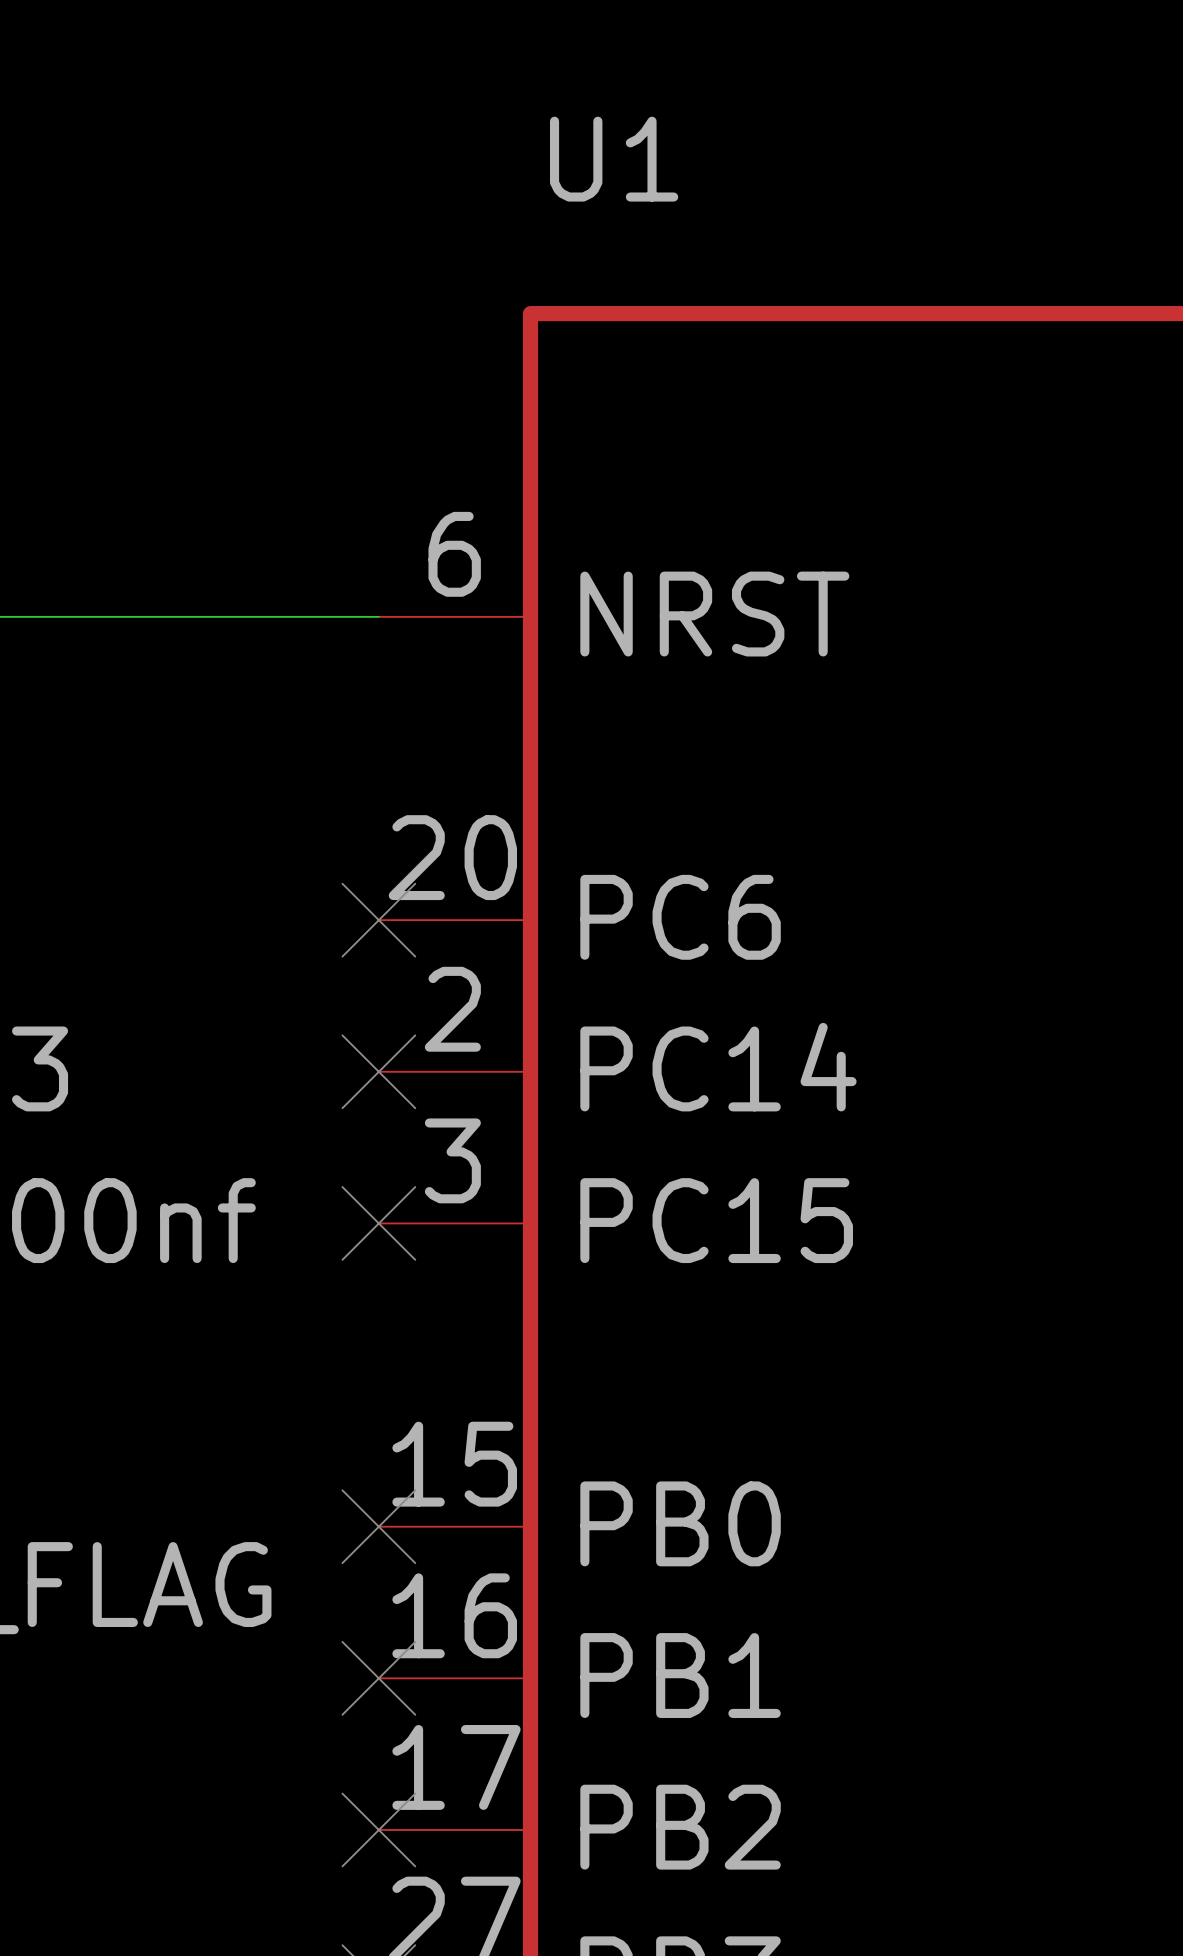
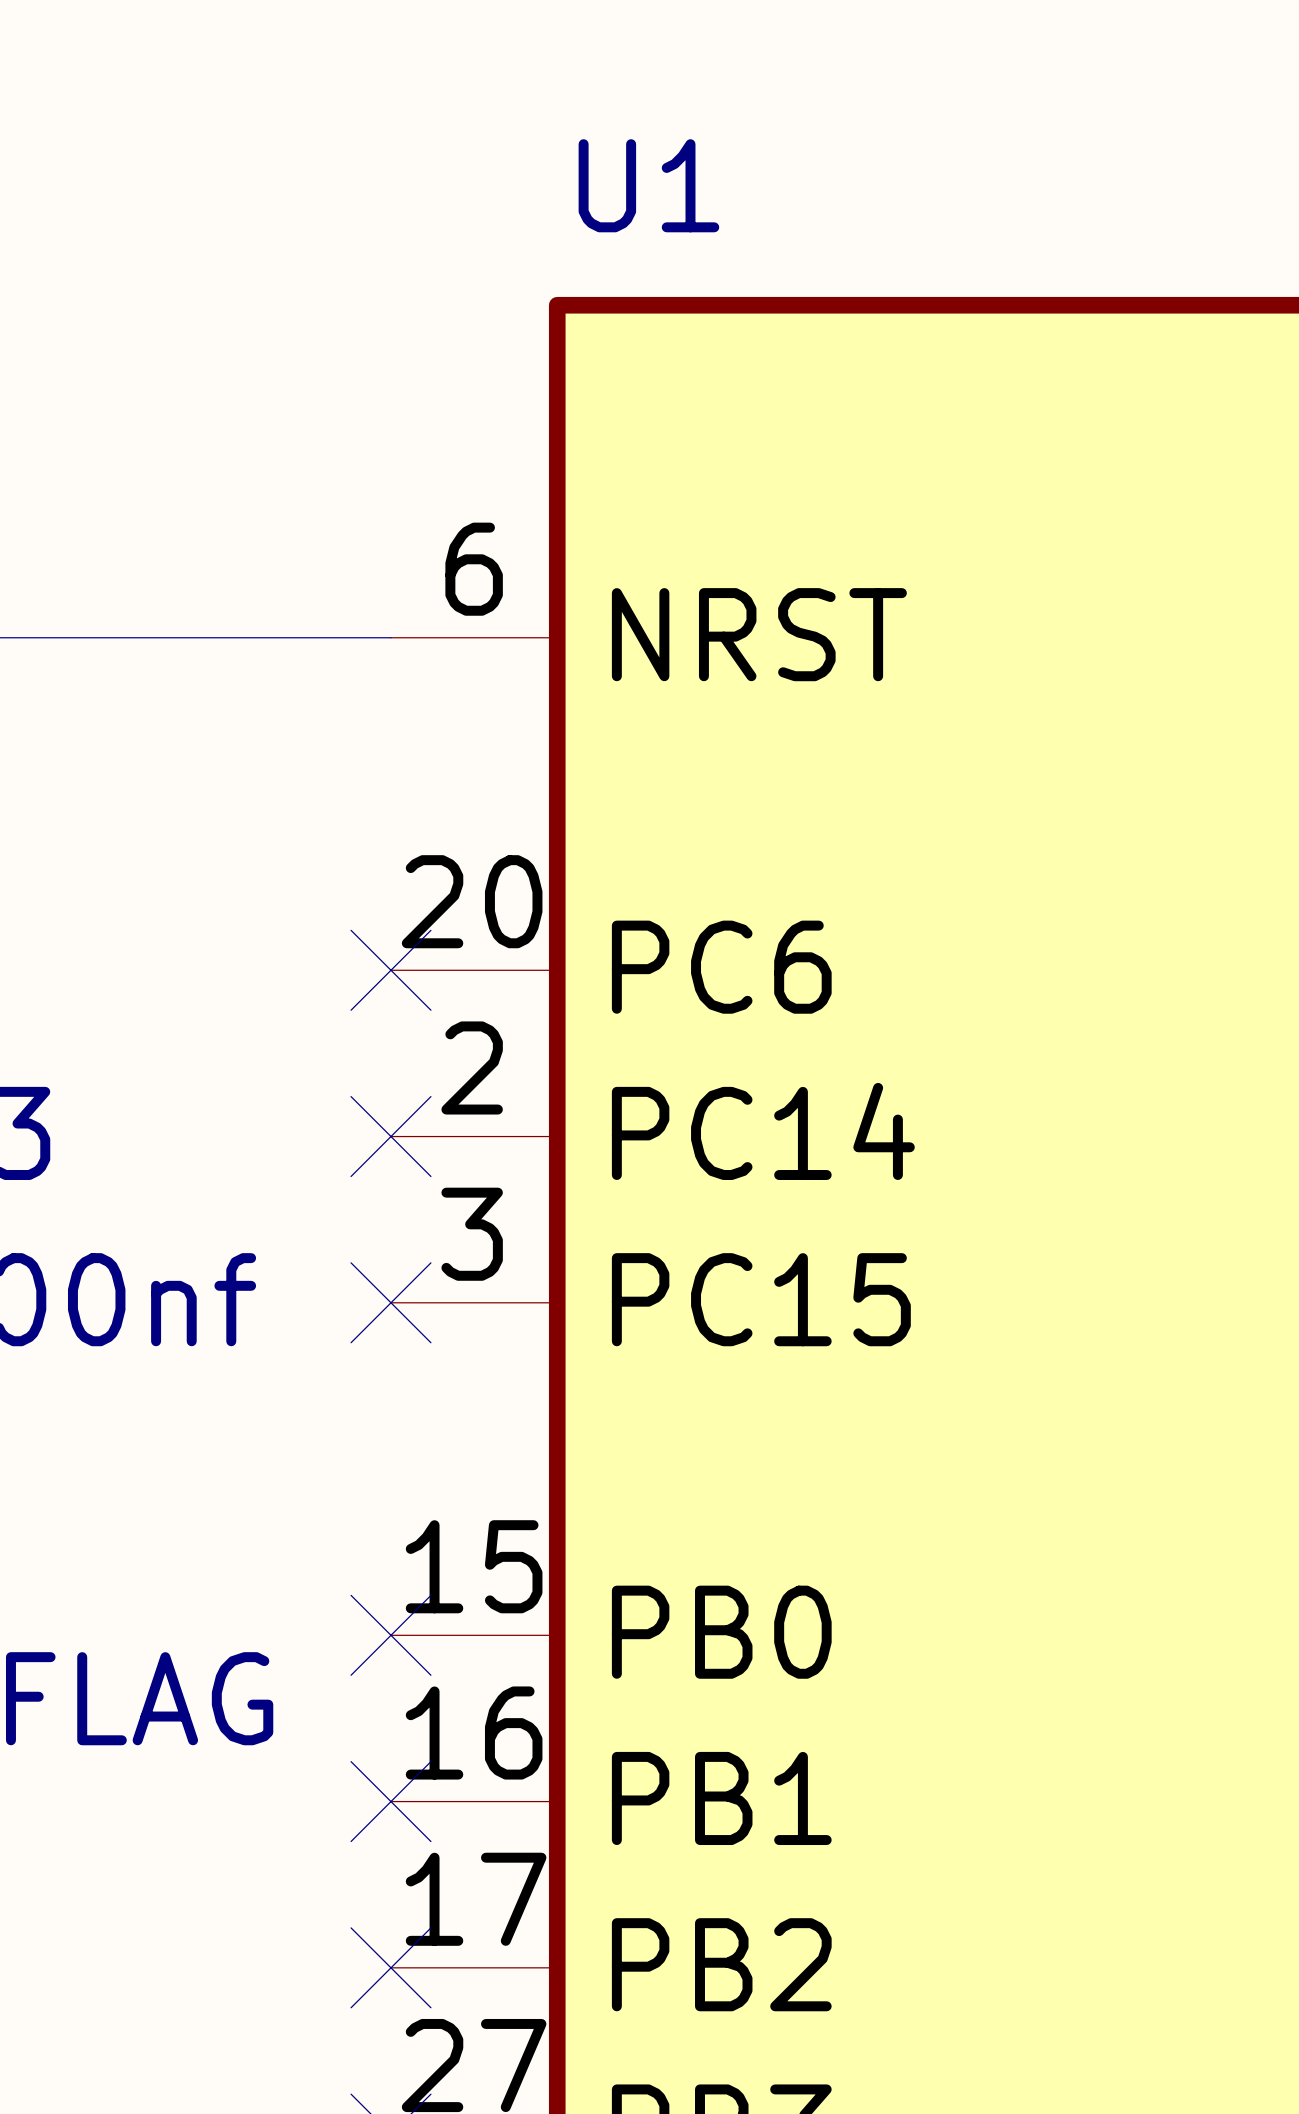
U1 name position: U1 (614, 159) -> U1 (648, 185)

